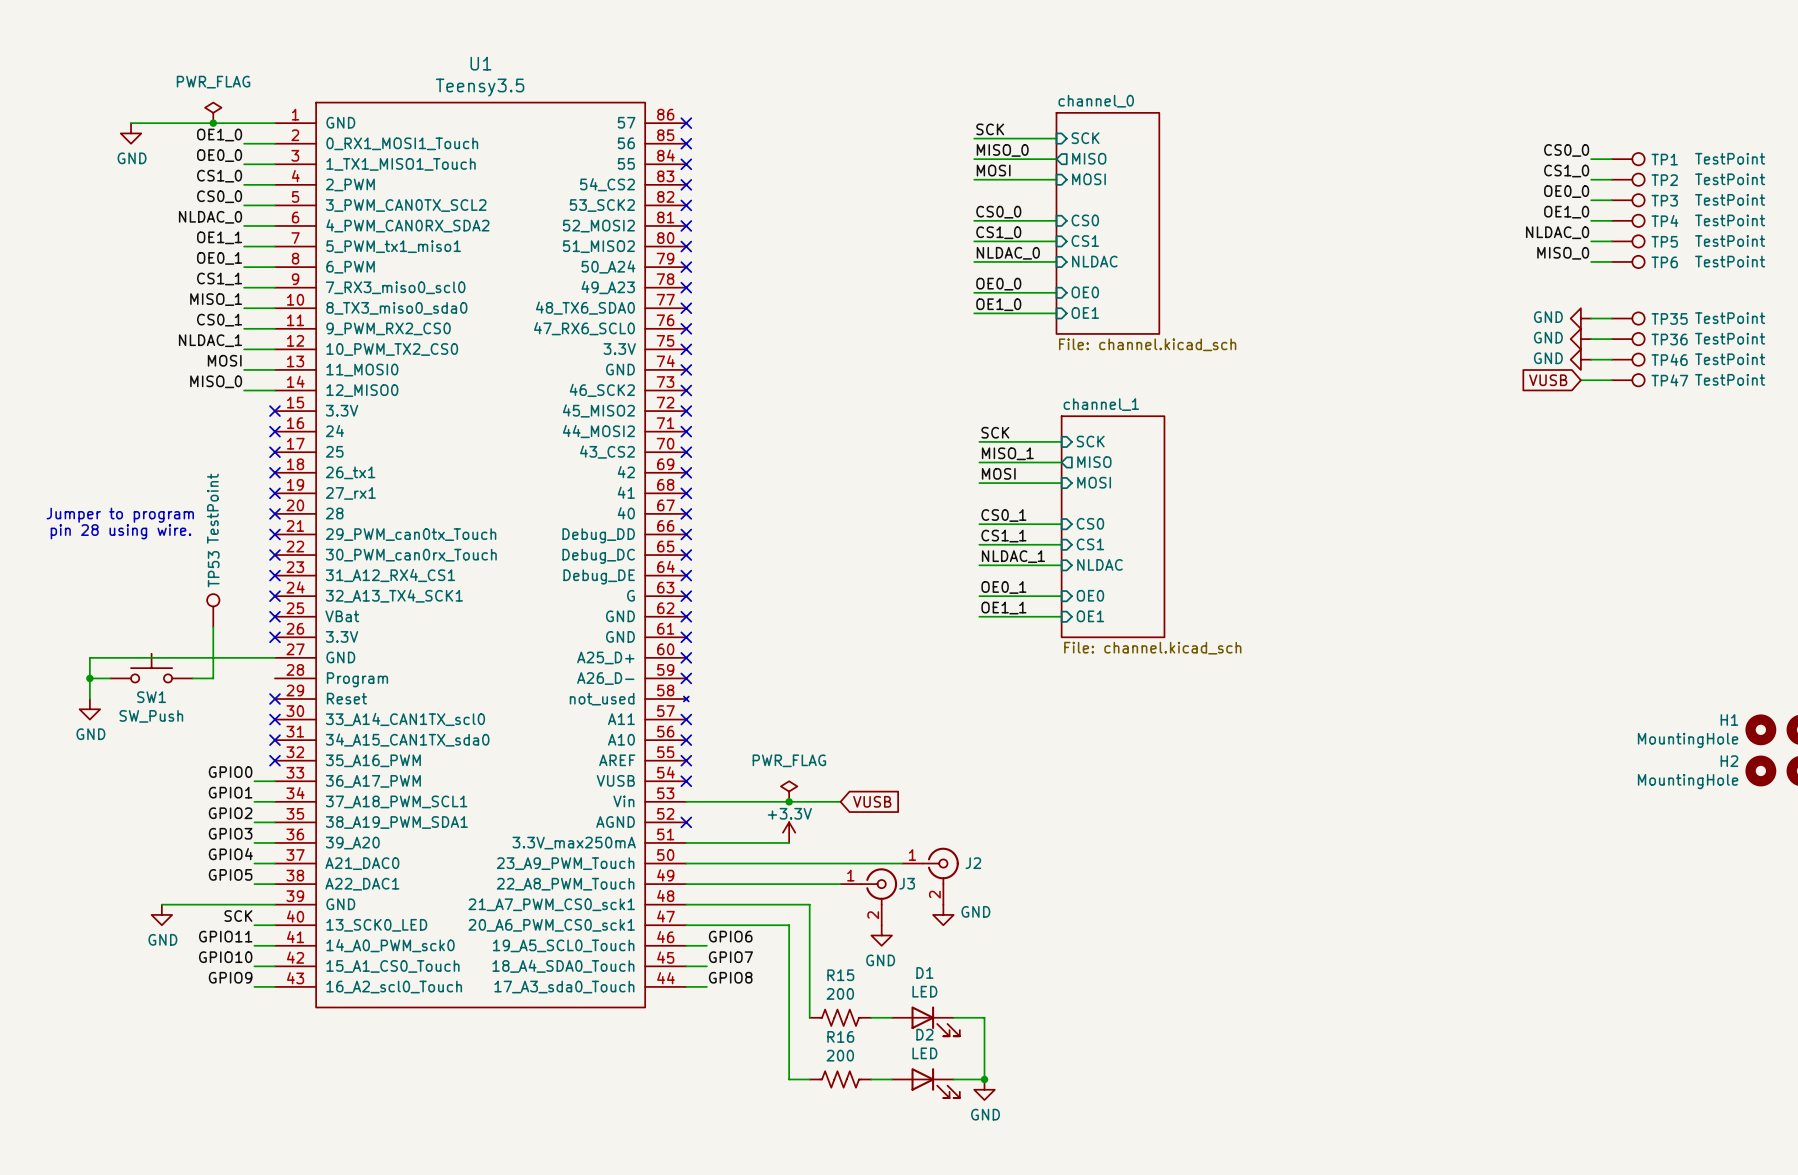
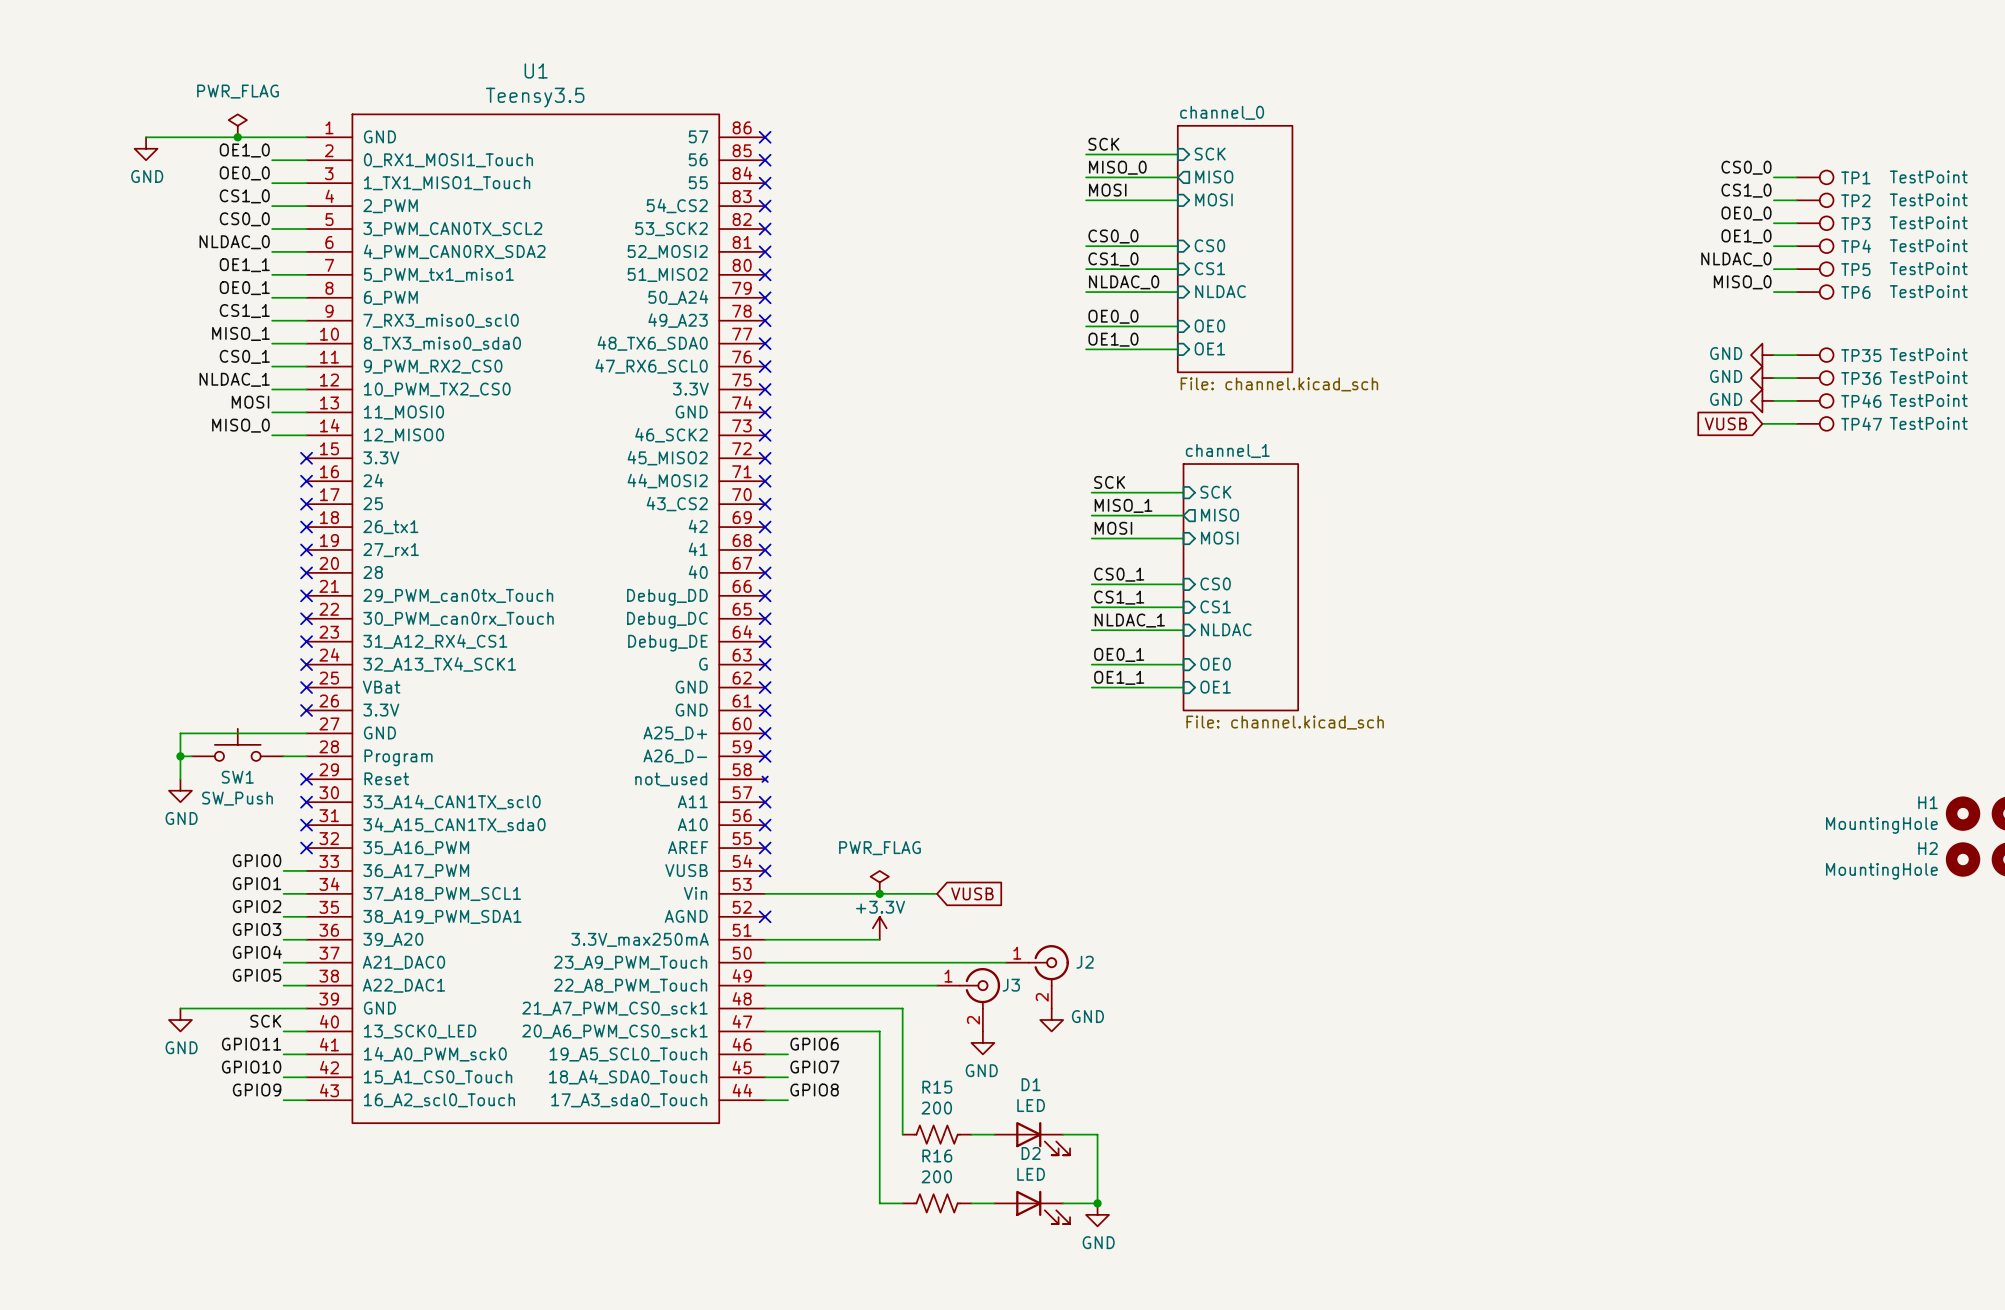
text: Jumper to program (120, 515) -> none
text: pin 28 using wire. (120, 531) -> none
TP53: TestPoint (213, 610) -> none
wire: (213, 627) (213, 678) (192, 678) -> none
wire: (161, 657) (89, 657) (89, 699) -> (180, 733) (180, 779)
SW1 position: (151, 668) -> (237, 744)
wire: (89, 678) (110, 678) -> (283, 756) (306, 756)
junction: (89, 678) -> none
wire: none -> (180, 756) (191, 756)
junction: none -> (180, 756)
power symbol position: GND (89, 709) -> GND (180, 790)

